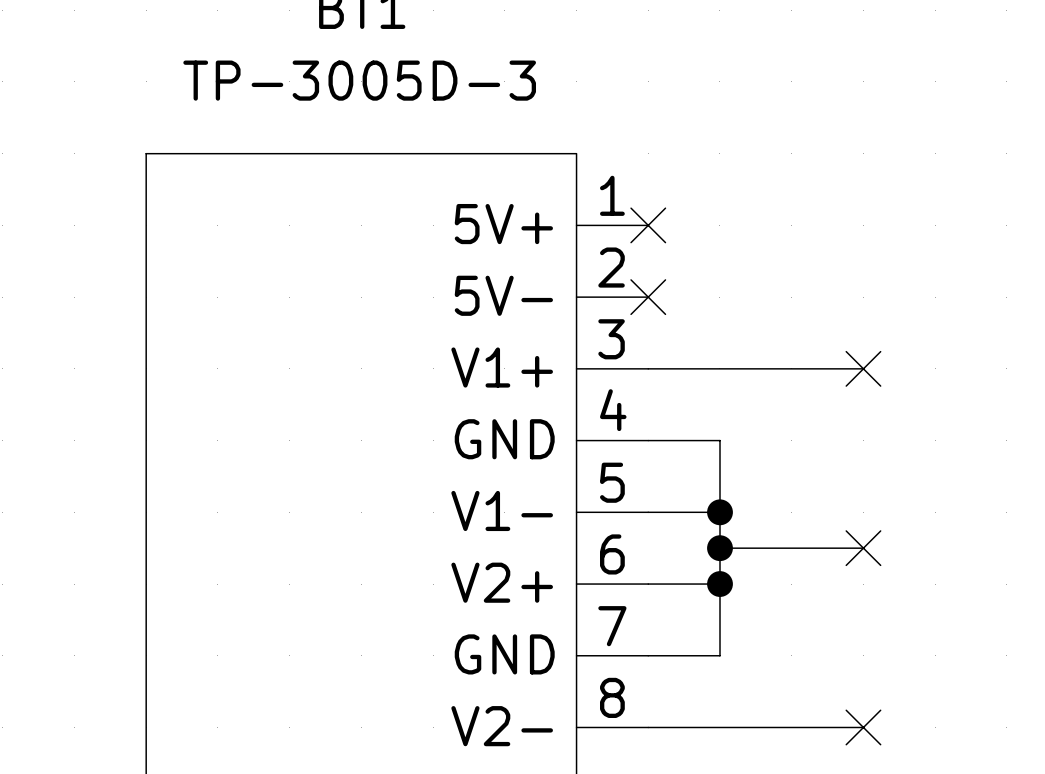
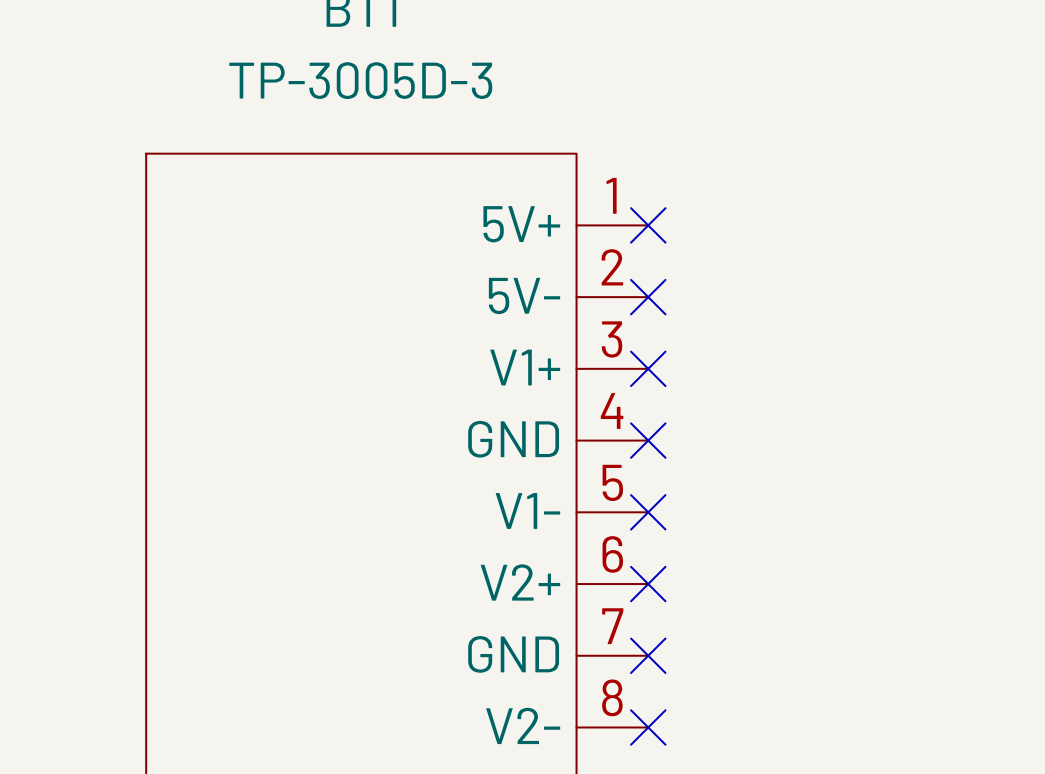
wire: (648, 368) (863, 368) -> none
no-connect mark: none -> (648, 368)
no-connect mark: (863, 368) -> none
wire: (648, 440) (719, 440) (719, 655) (648, 655) -> none
no-connect mark: none -> (648, 440)
wire: (648, 512) (719, 512) -> none
no-connect mark: none -> (648, 512)
junction: (719, 512) -> none
wire: (719, 548) (863, 548) -> none
junction: (719, 548) -> none
no-connect mark: (863, 548) -> none
wire: (648, 584) (719, 584) -> none
no-connect mark: none -> (648, 584)
junction: (719, 584) -> none
no-connect mark: none -> (648, 655)
wire: (648, 727) (863, 727) -> none
no-connect mark: none -> (648, 727)
no-connect mark: (863, 727) -> none

